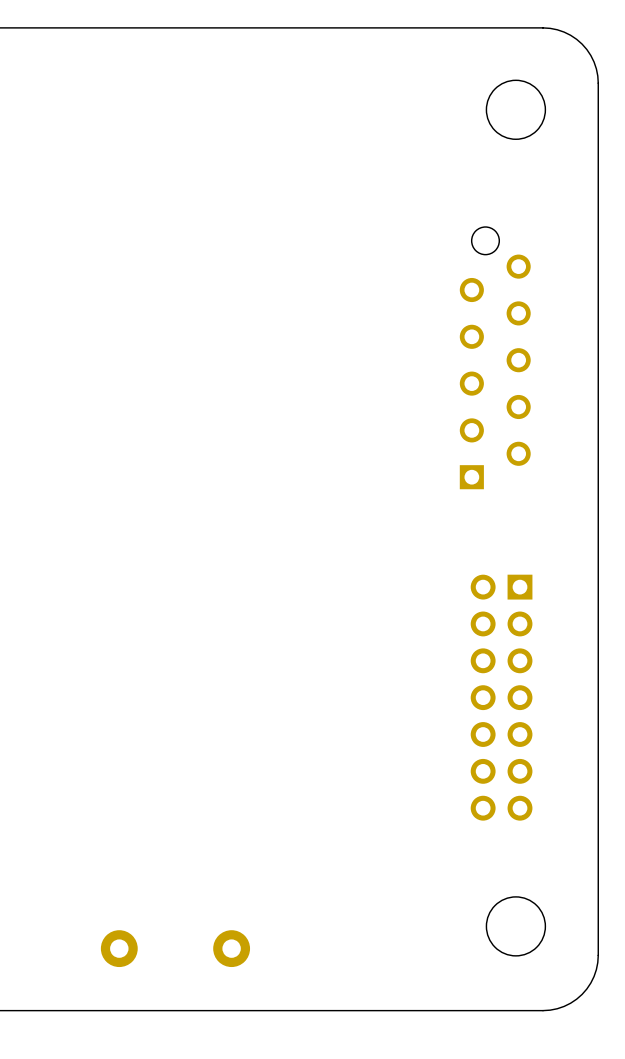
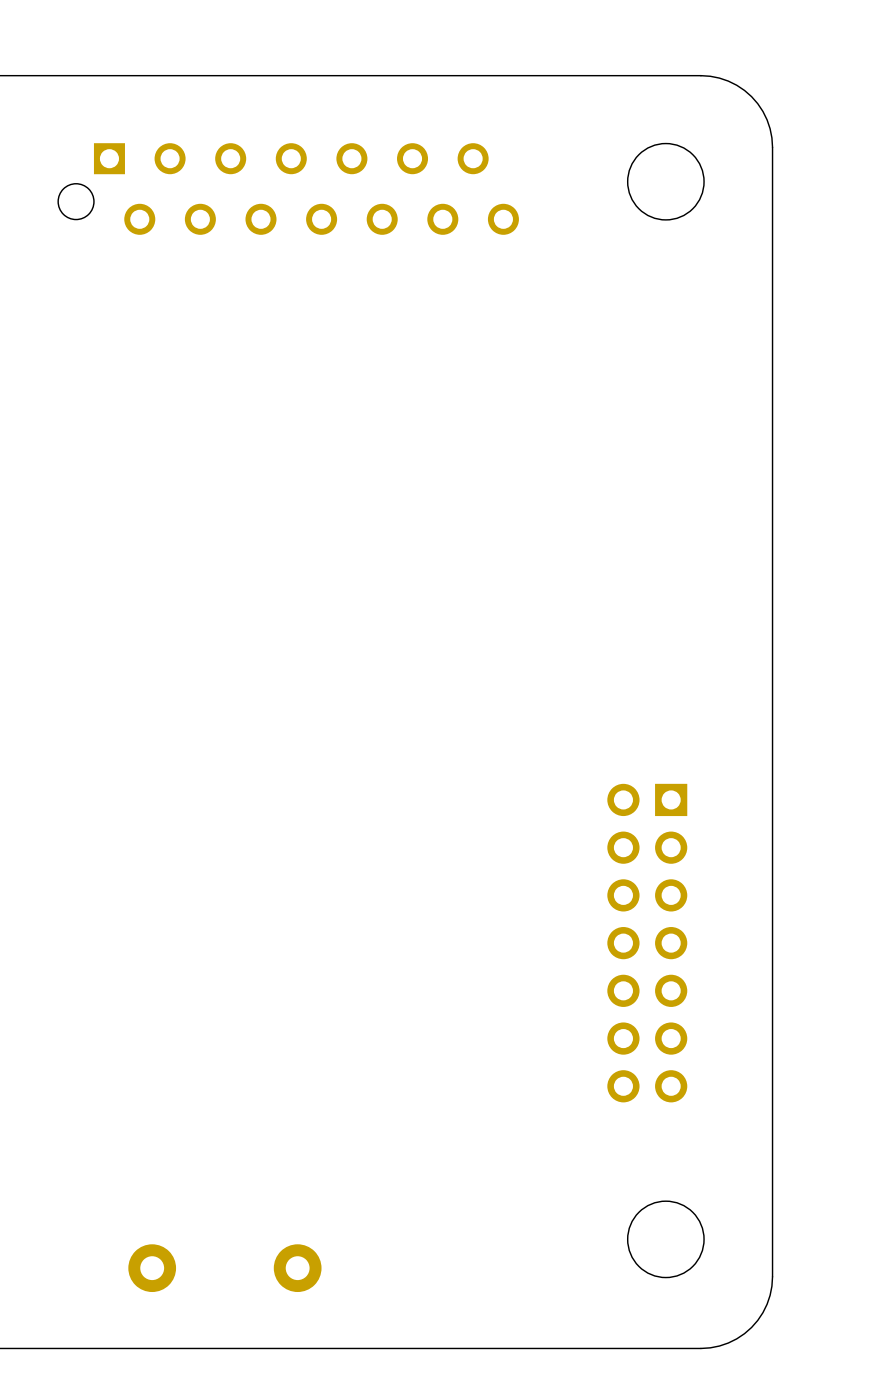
part: none -> (288, 189)
part: (495, 358) -> none

